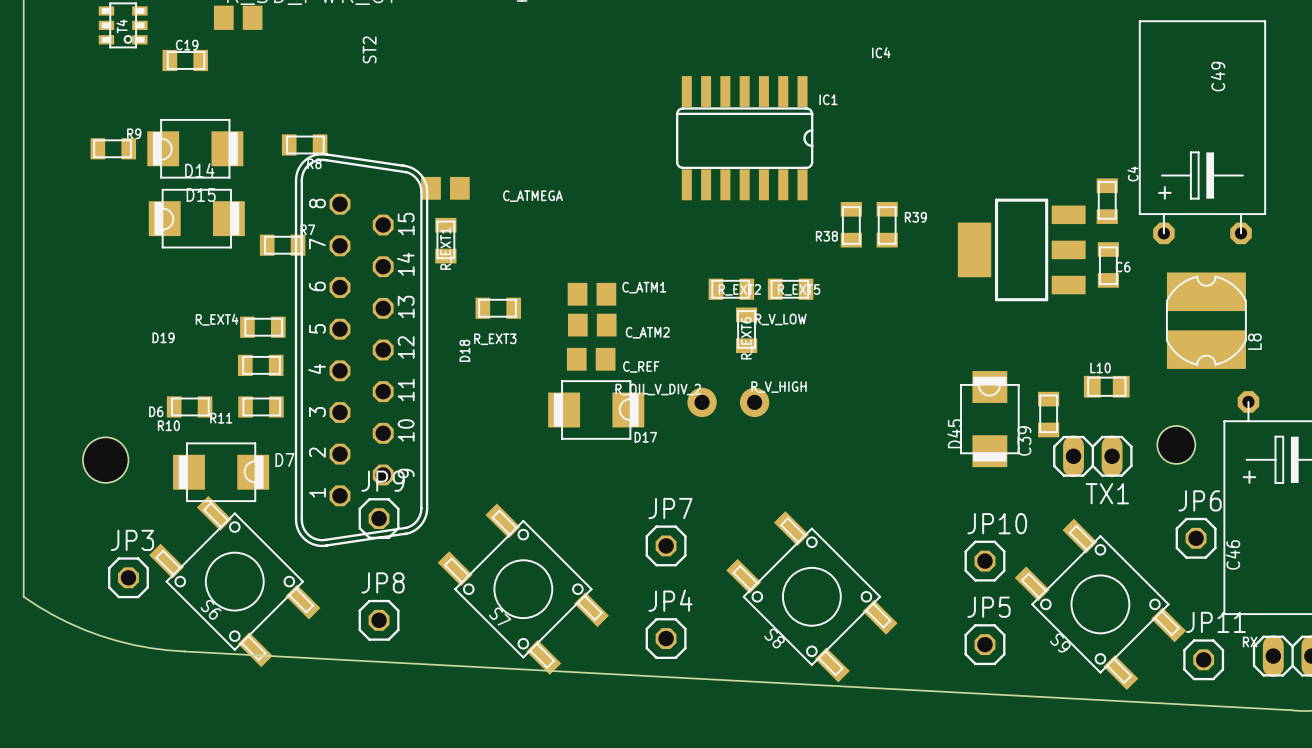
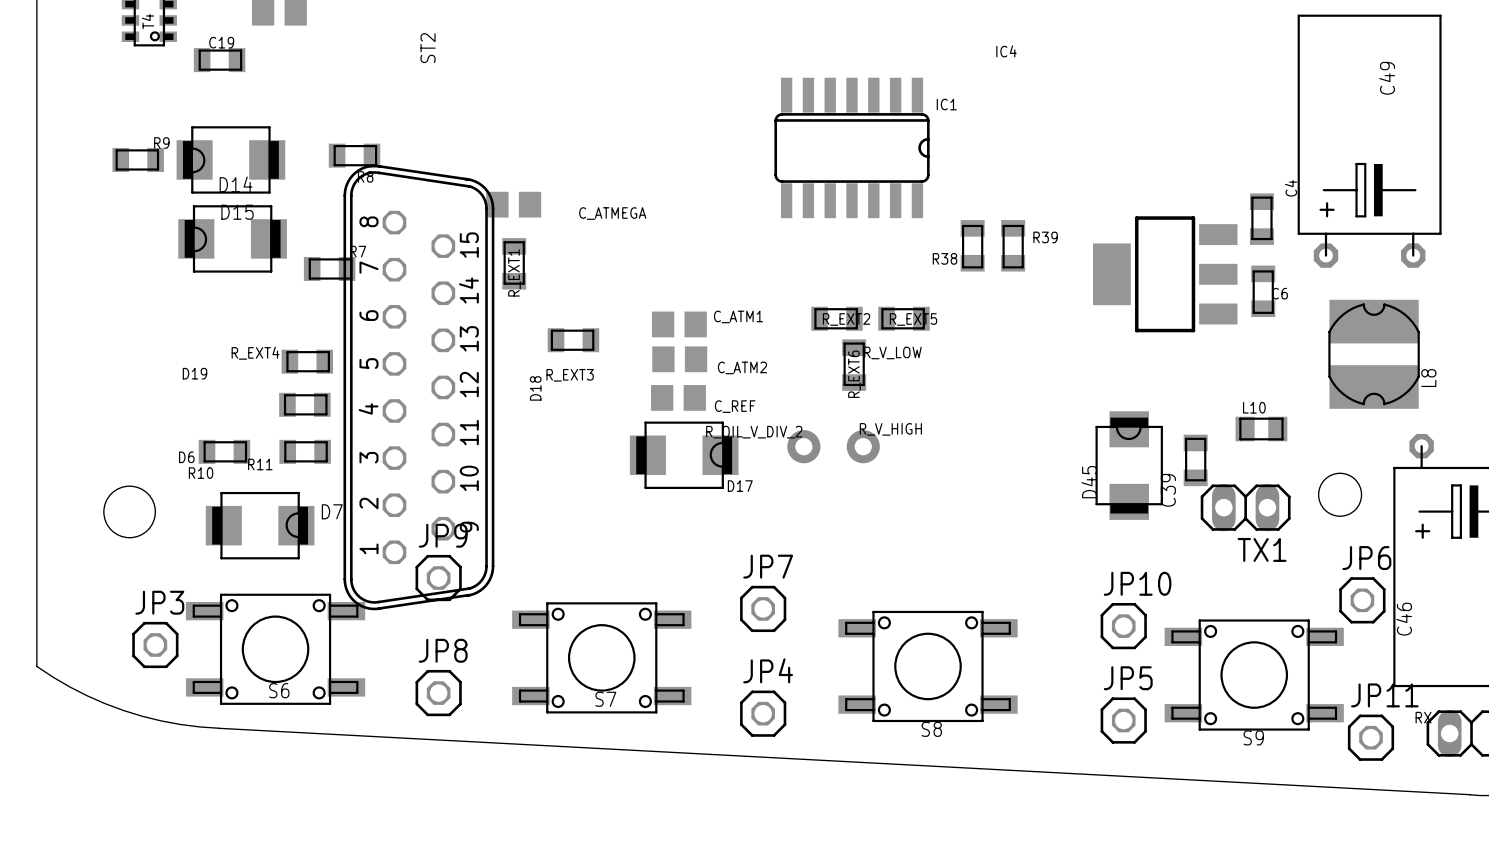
S6 rotation: 0° (234, 581) -> 45° counterclockwise (275, 649)
S7 rotation: 0° (523, 589) -> 45° counterclockwise (601, 657)
S8 rotation: 0° (811, 596) -> 45° counterclockwise (928, 666)
S9 rotation: 0° (1100, 604) -> 45° counterclockwise (1254, 675)

